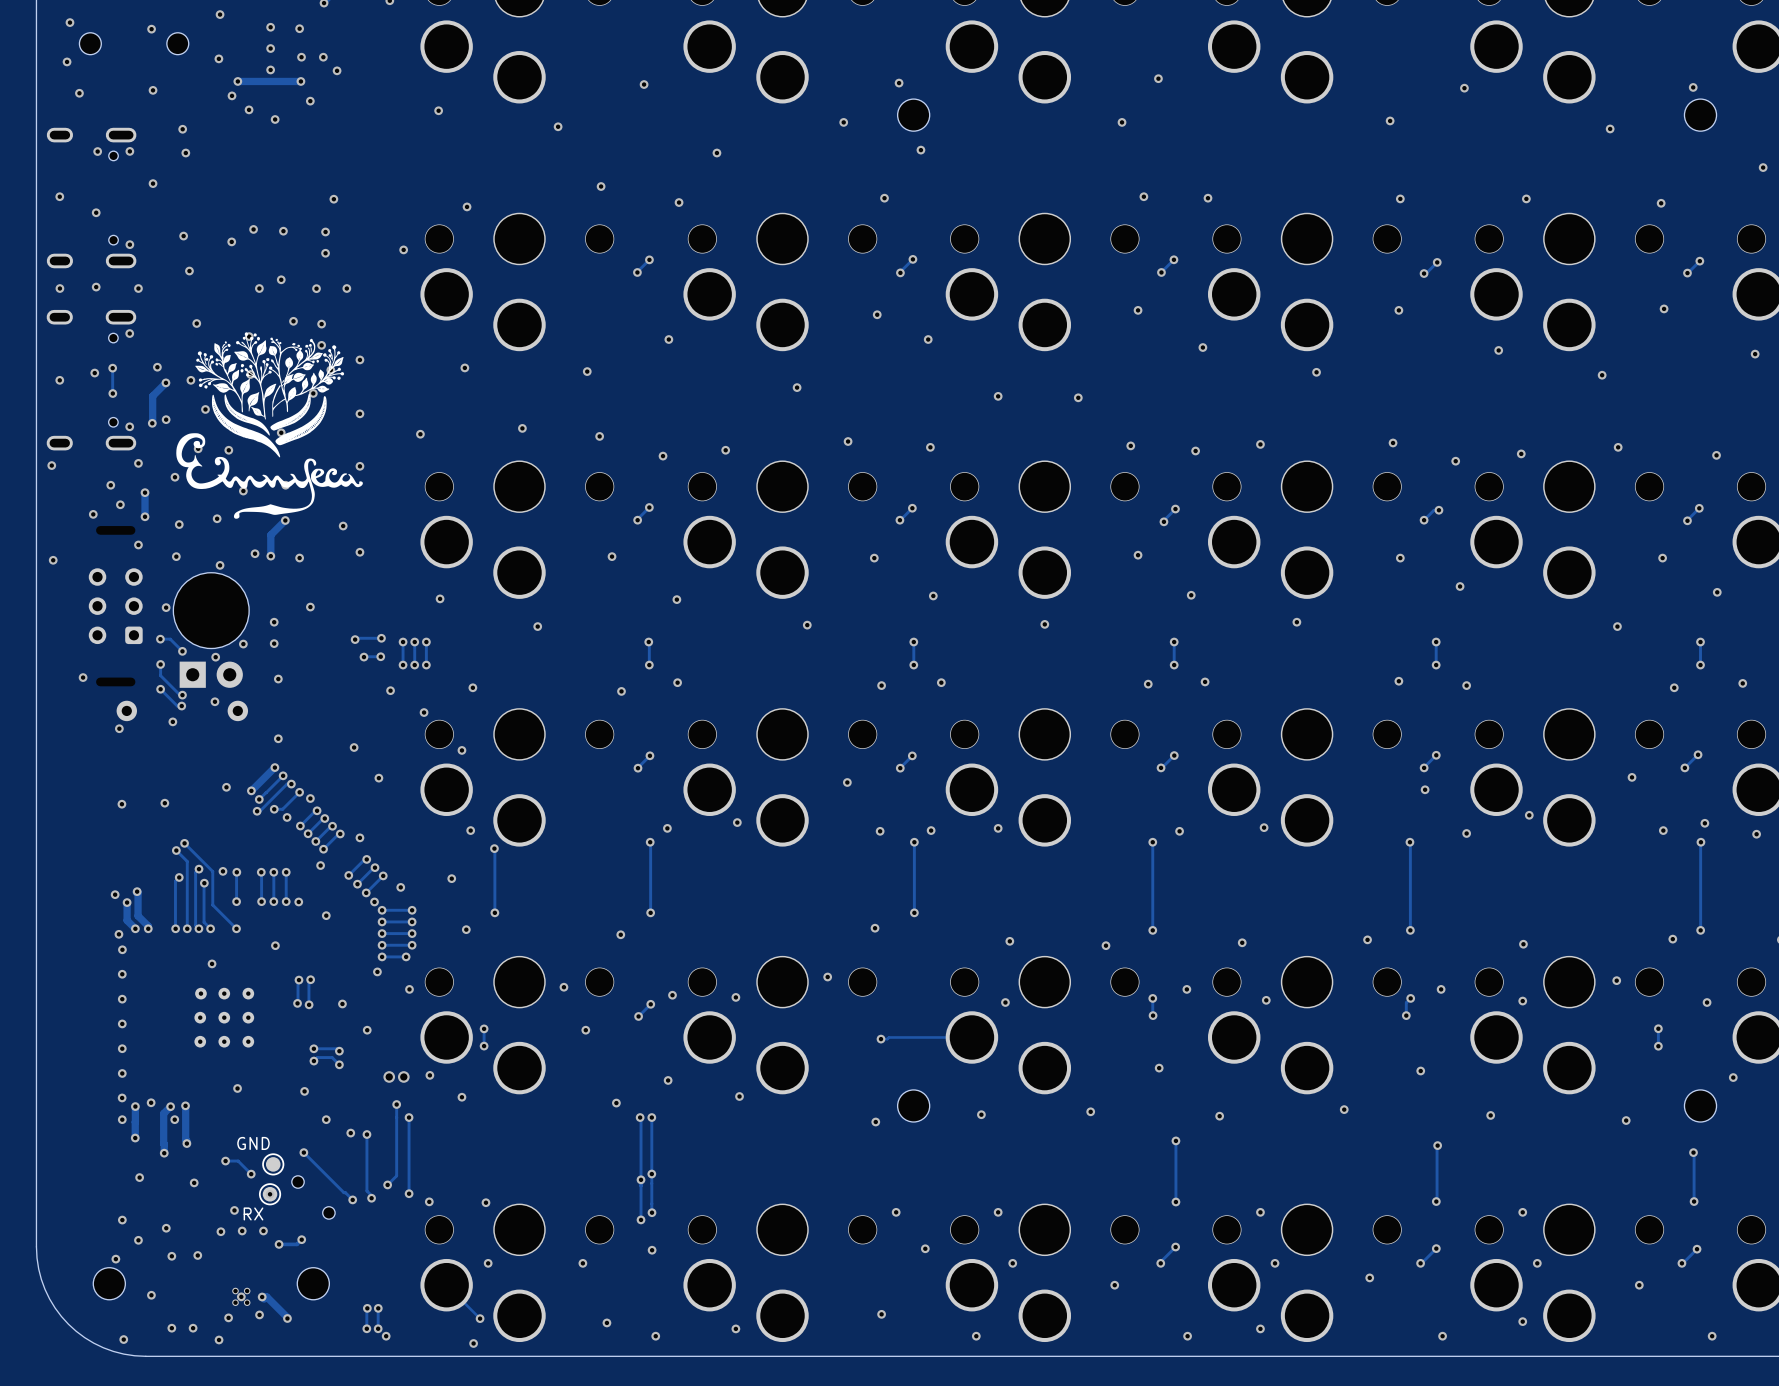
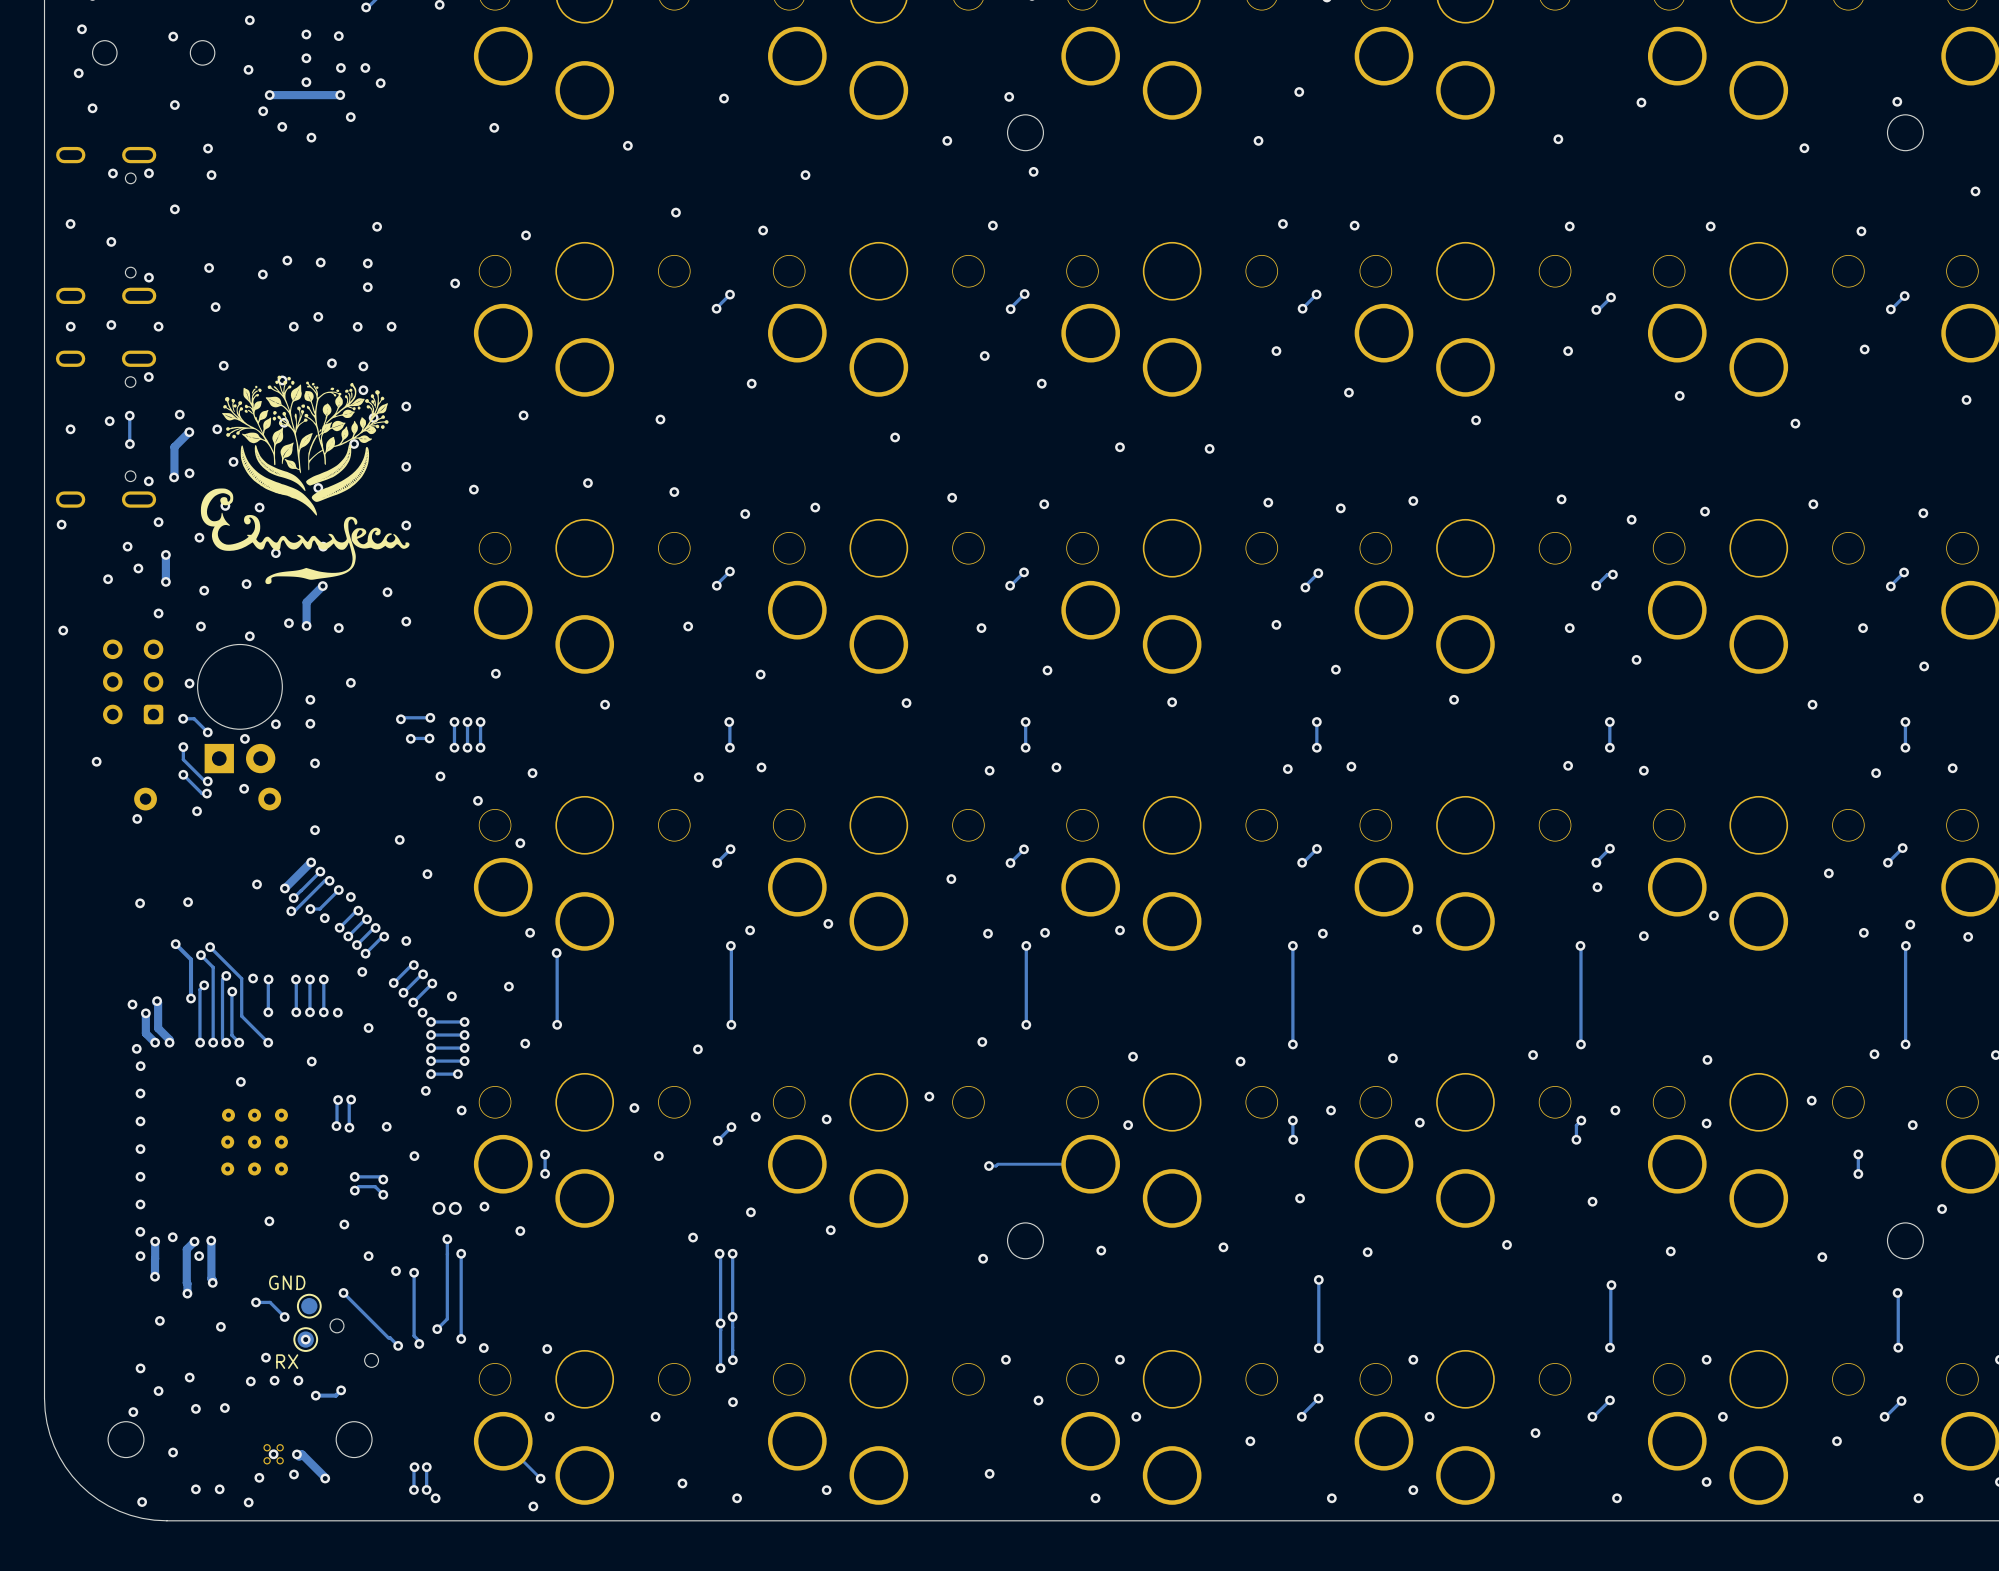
track: none -> (175, 944) (191, 959) (191, 998)
via: none -> (175, 944)
via: none -> (191, 998)

